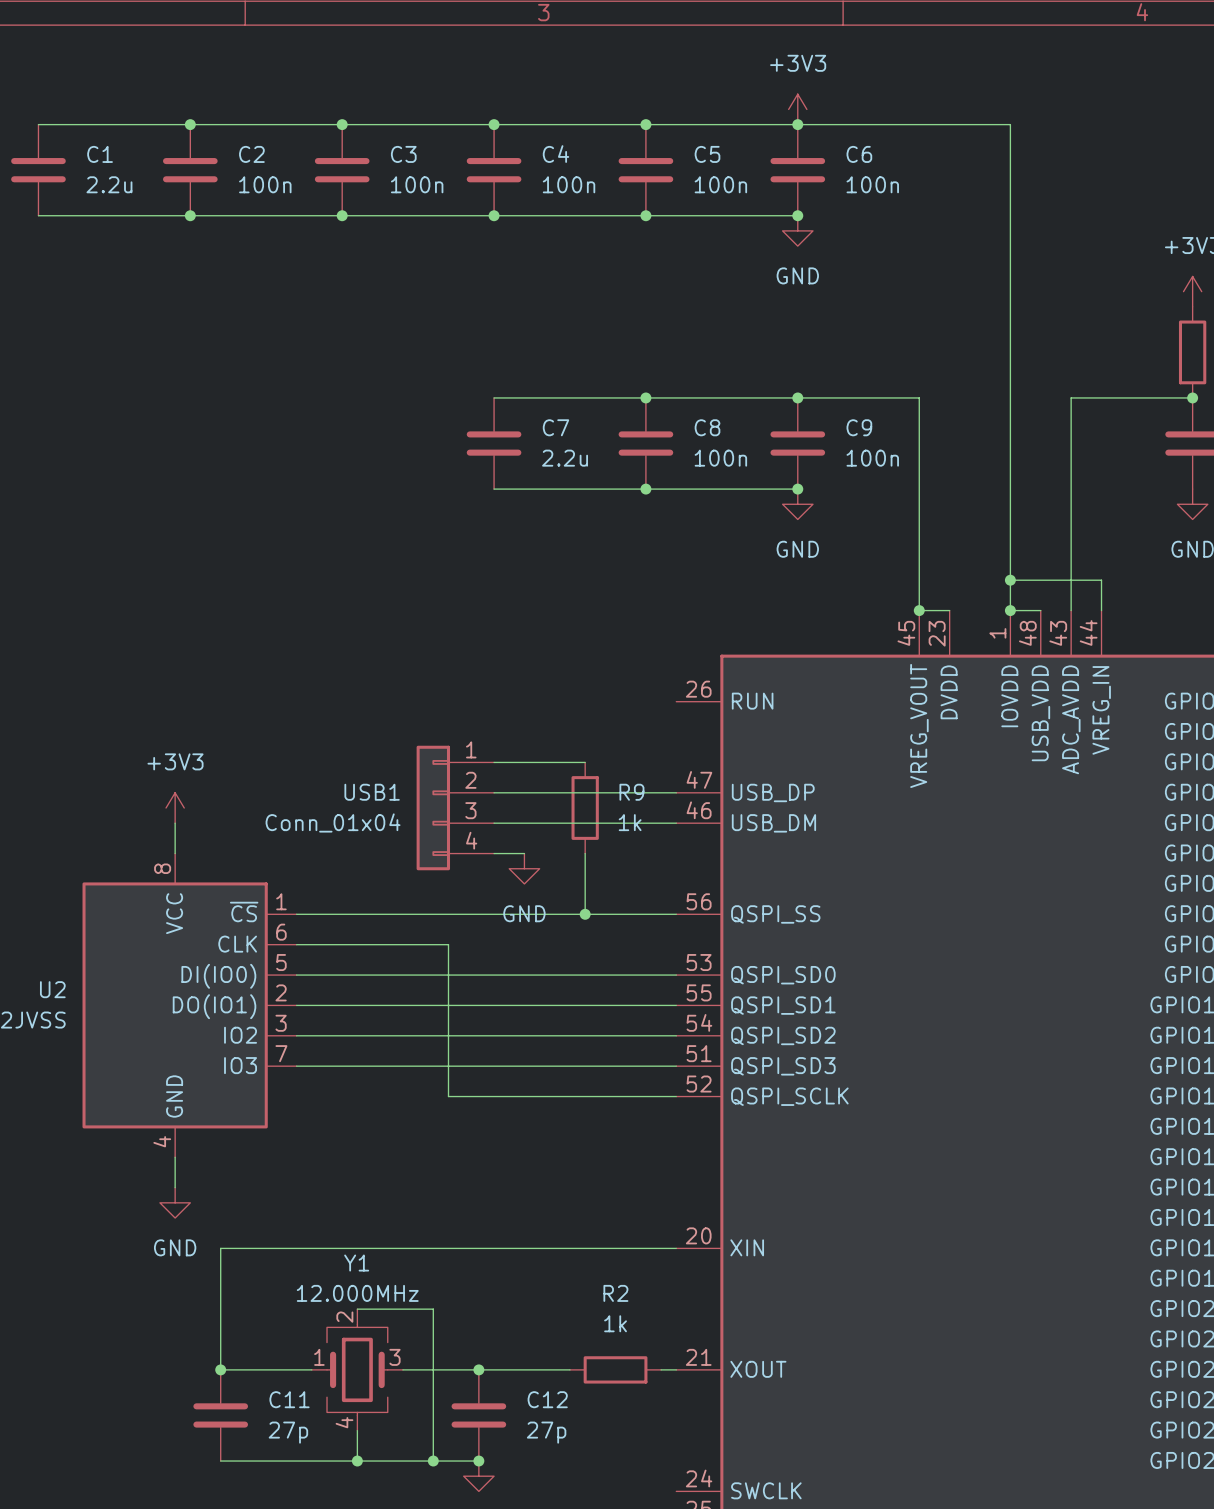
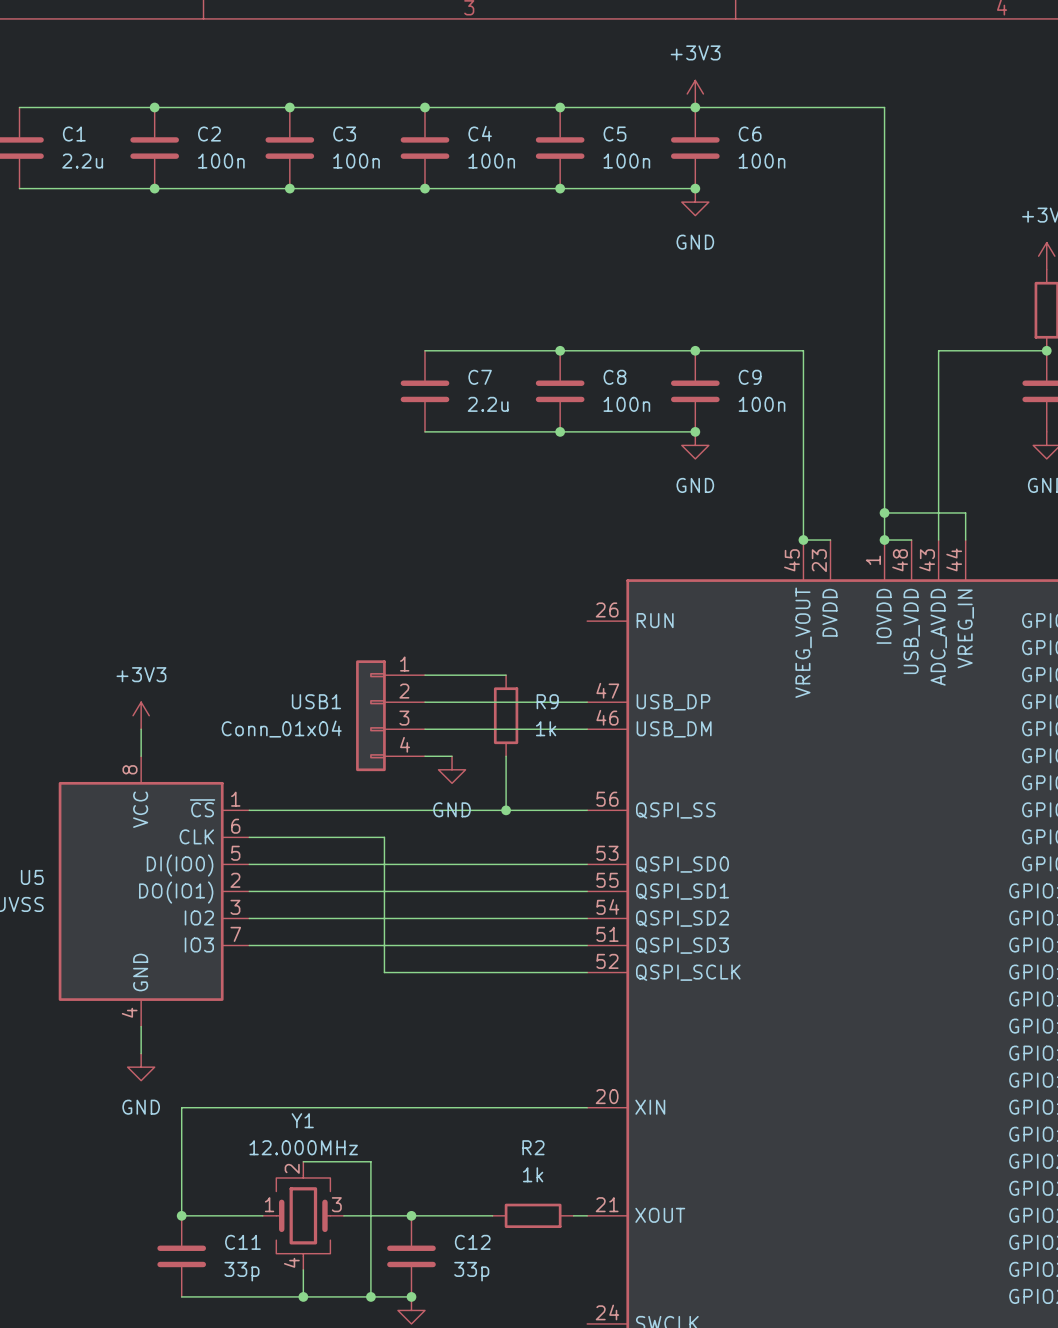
U2 name: U2 (52, 989) -> U5 (32, 877)
C11 value: 27p (288, 1432) -> 33p (241, 1271)
C12 value: 27p (546, 1432) -> 33p (471, 1271)

